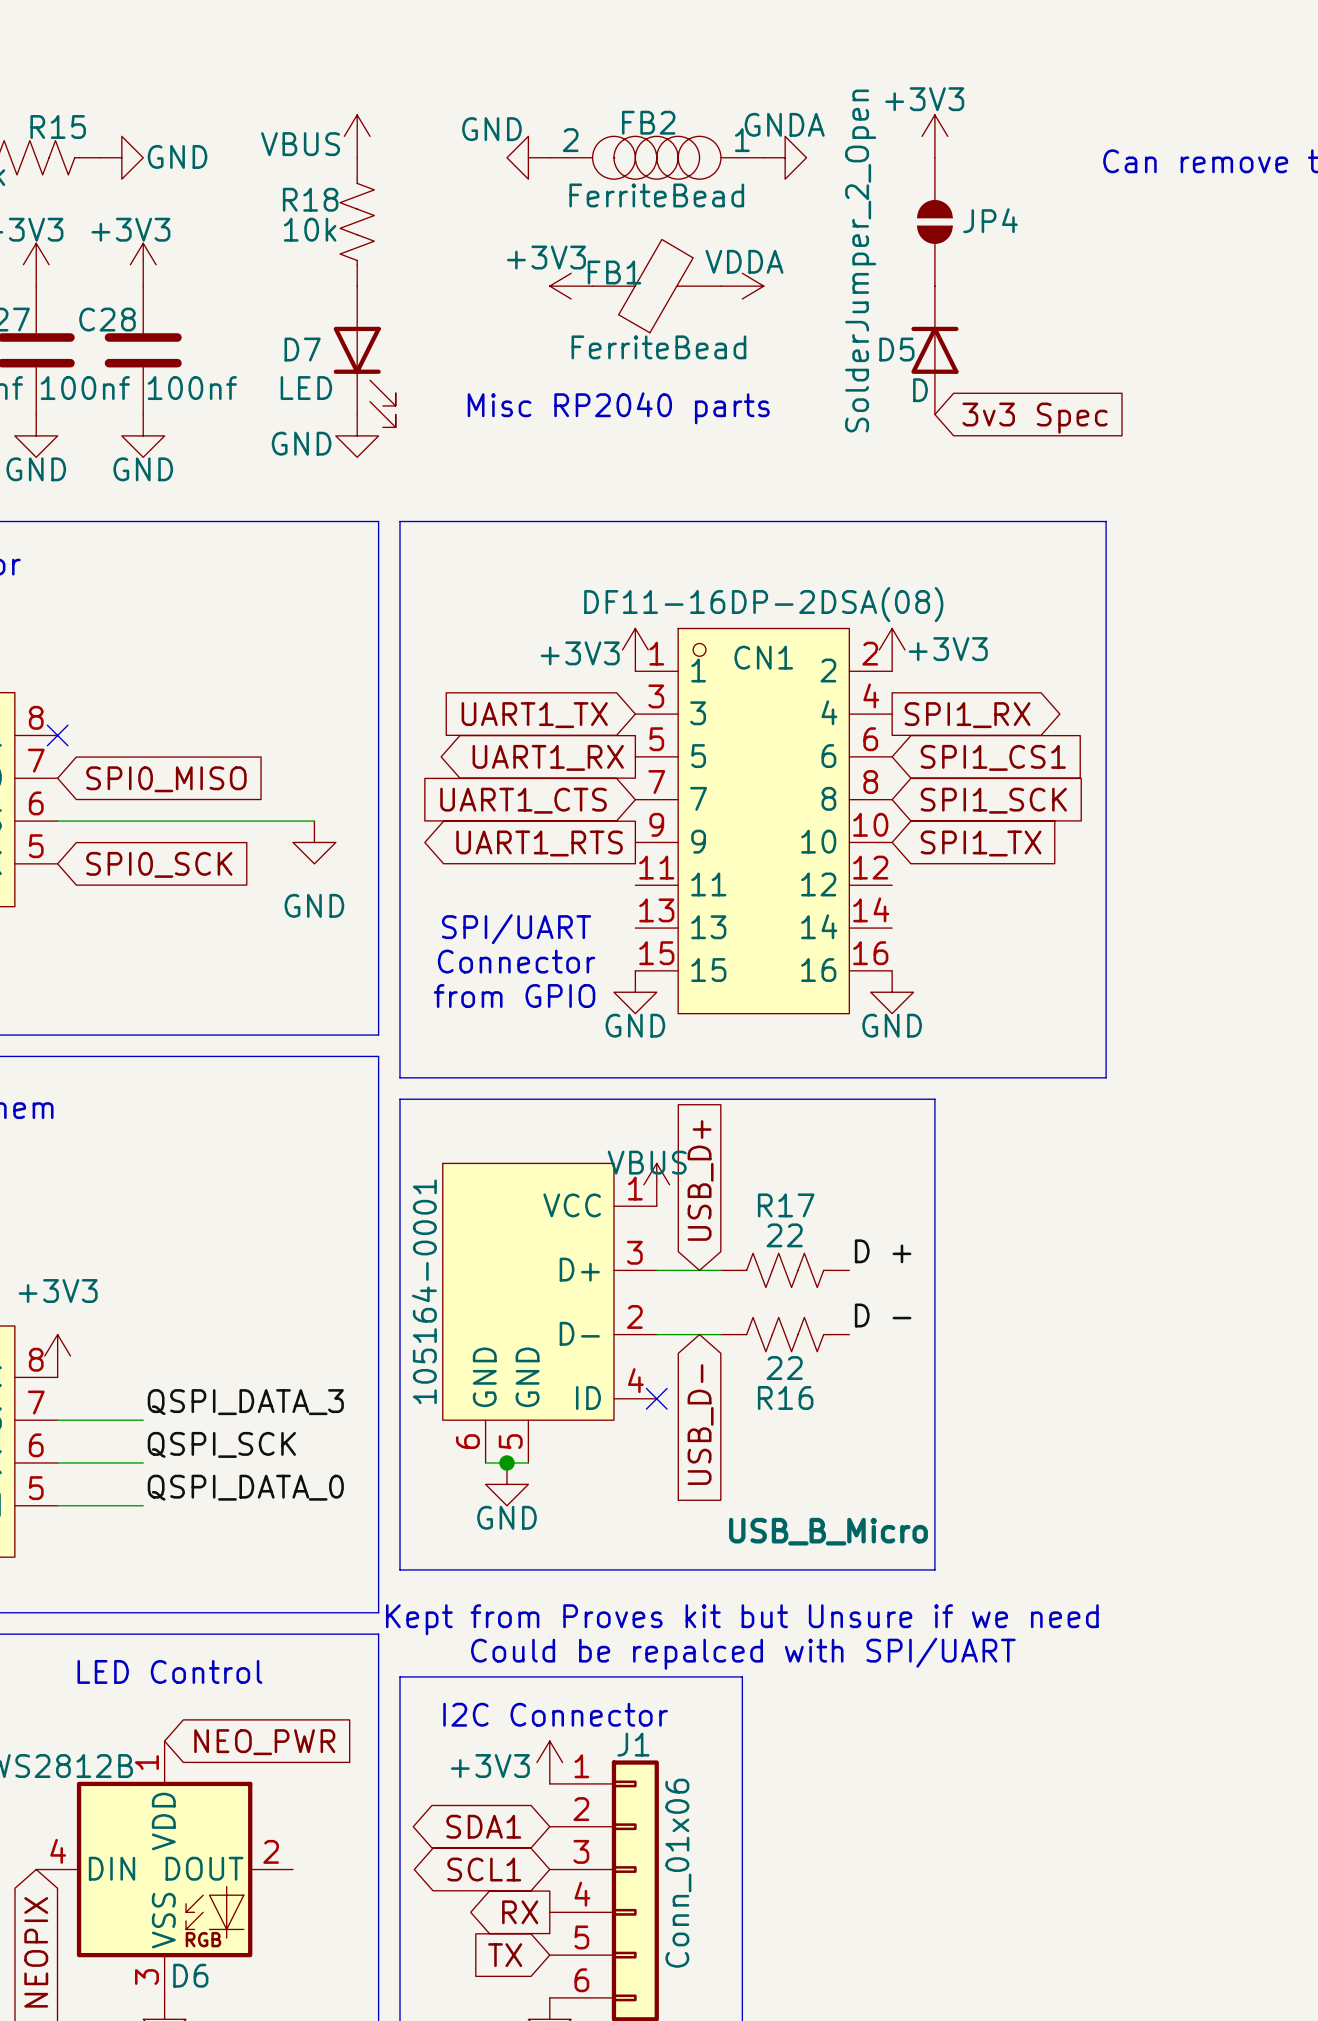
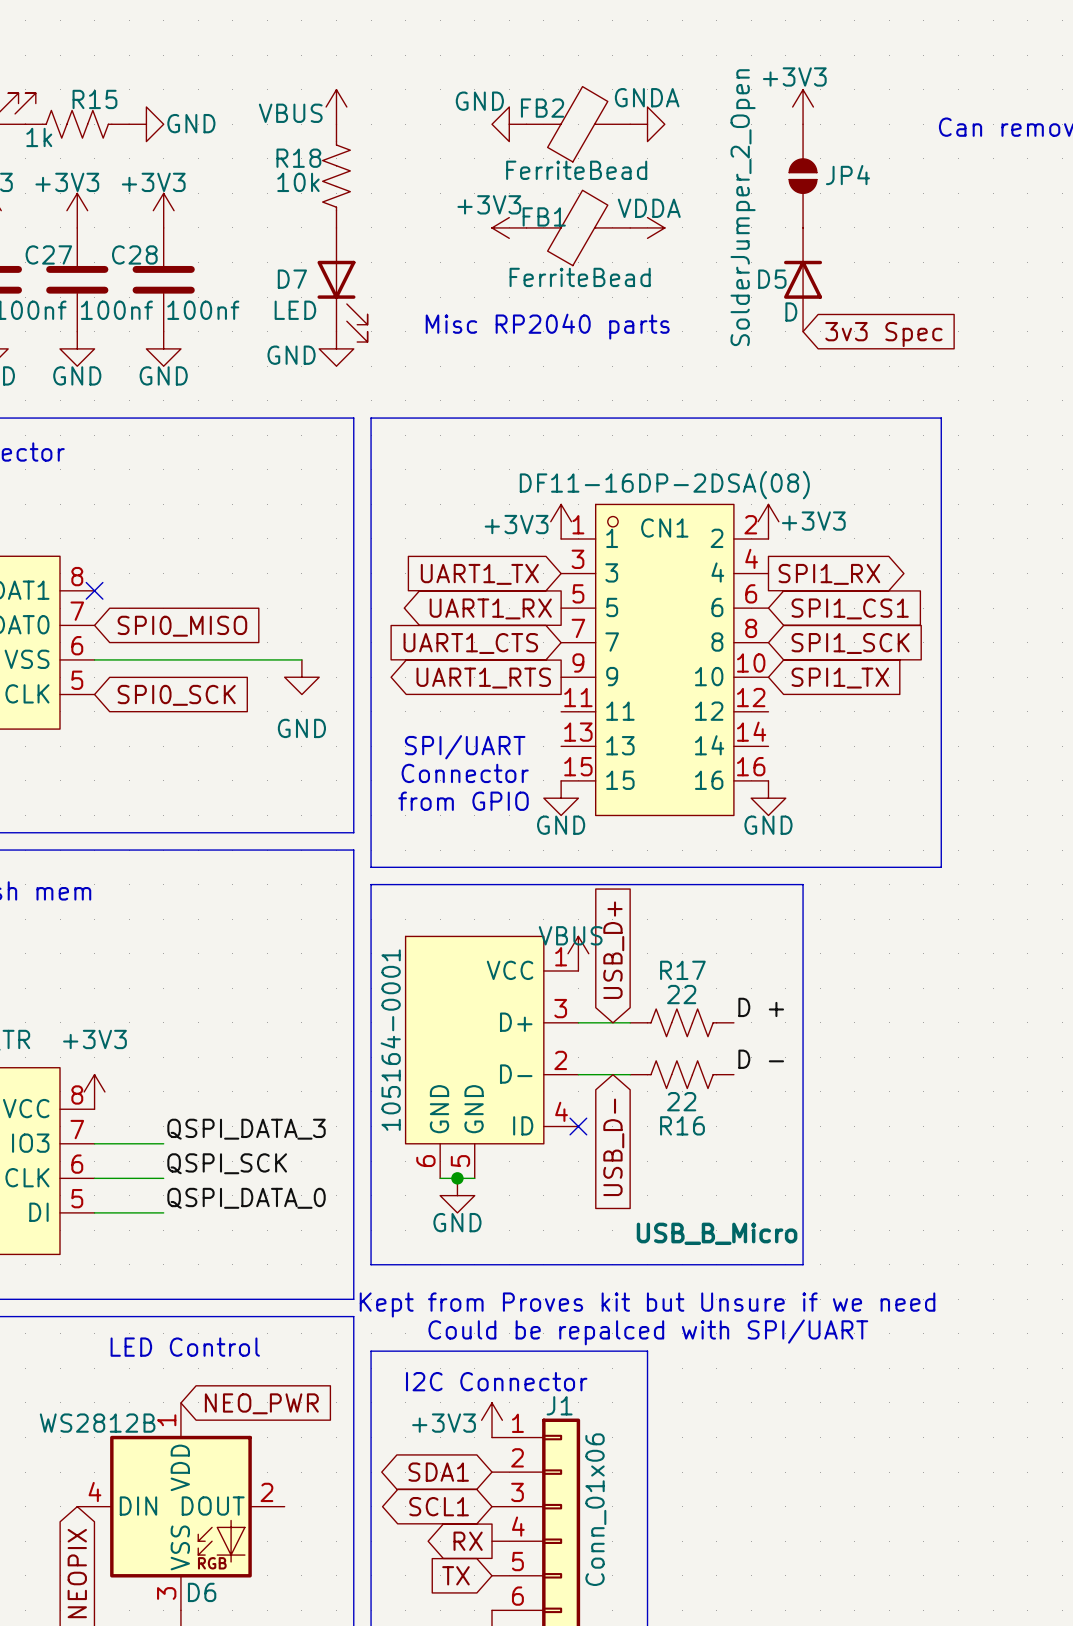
FB2 name position: FB2 (648, 122) -> FB2 (542, 108)
FB2 symbol: [549, 136, 764, 180] -> [526, 86, 631, 162]
power symbol position: GND (528, 157) -> GND (509, 124)
power symbol position: GNDA (785, 157) -> GNDA (647, 124)

